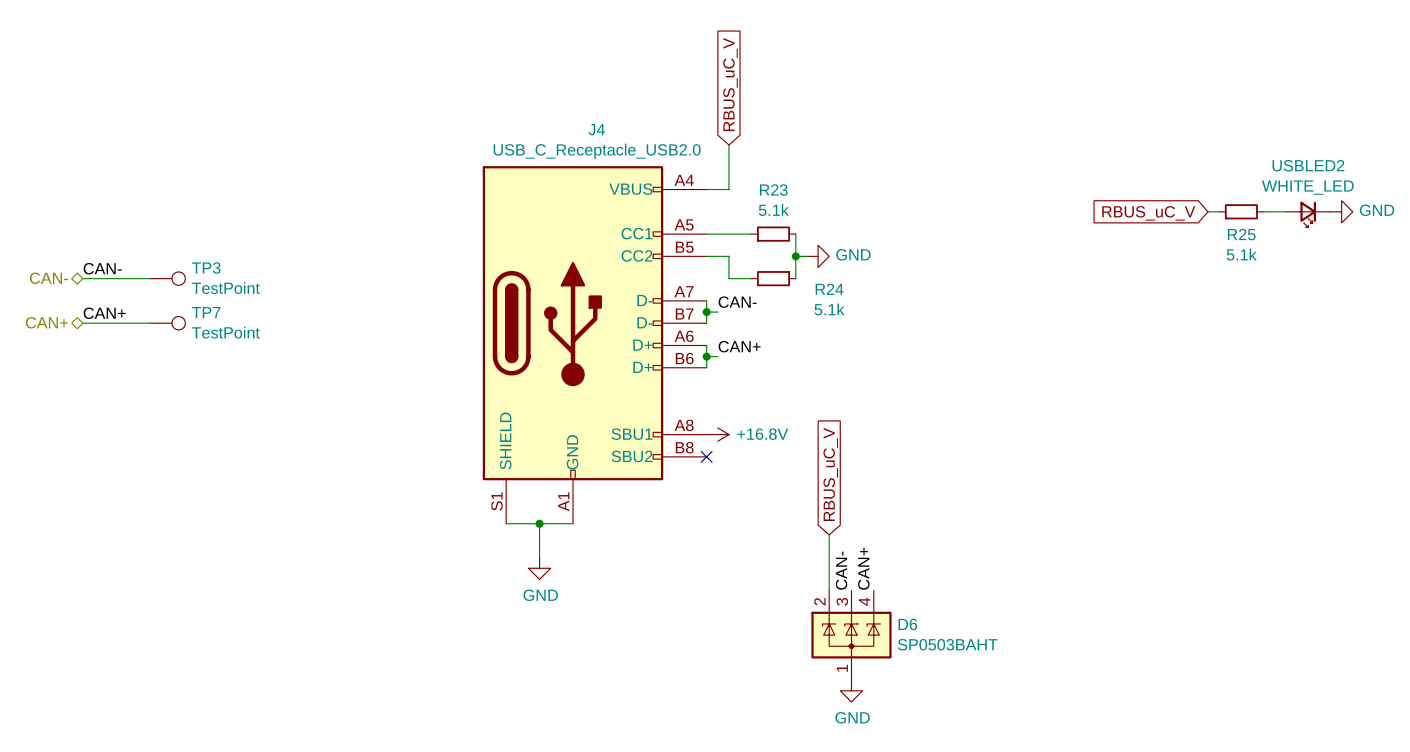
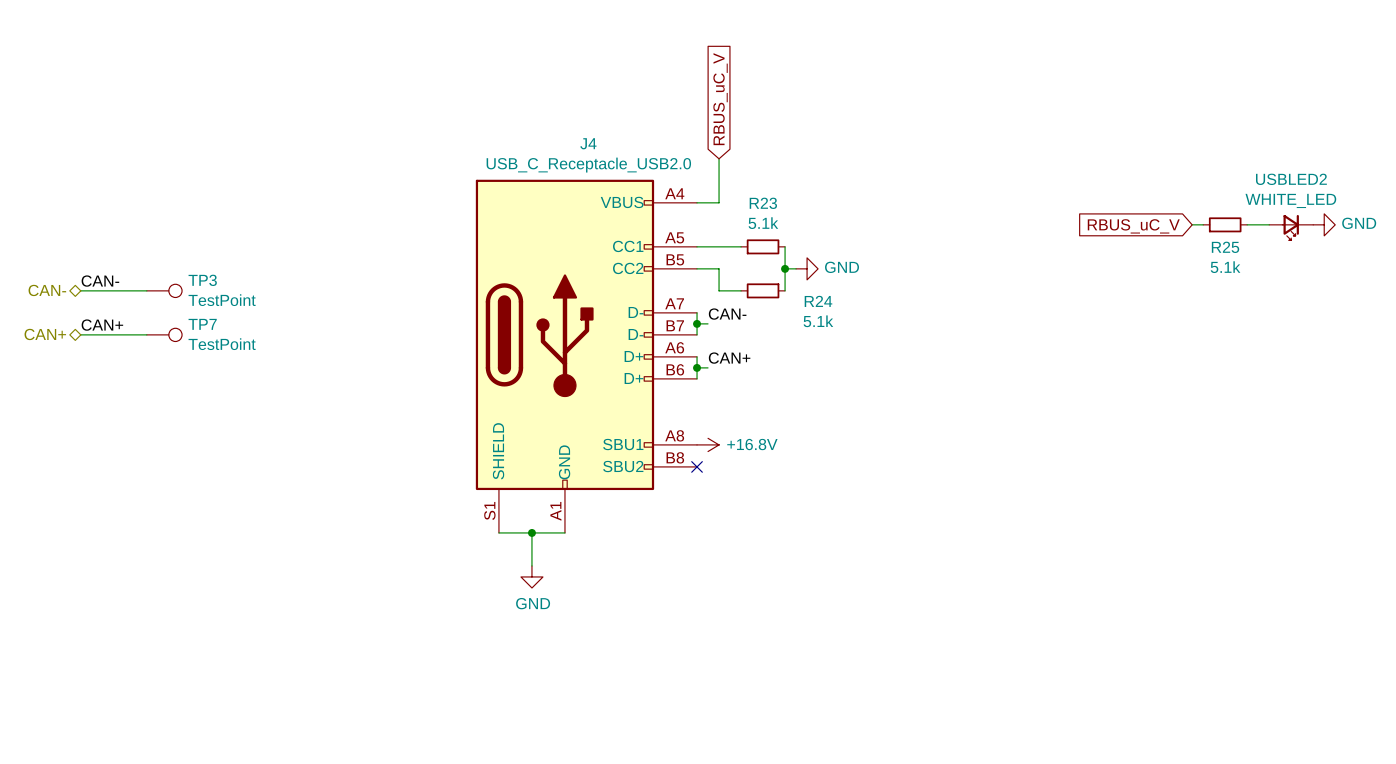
global label: RBUS_uC_V (830, 474) -> none
wire: (829, 534) (829, 590) -> none
label: CAN+ (863, 568) -> none
label: CAN- (841, 570) -> none
D6: SP0503BAHT (851, 635) -> none
power symbol: GND (851, 690) -> none

